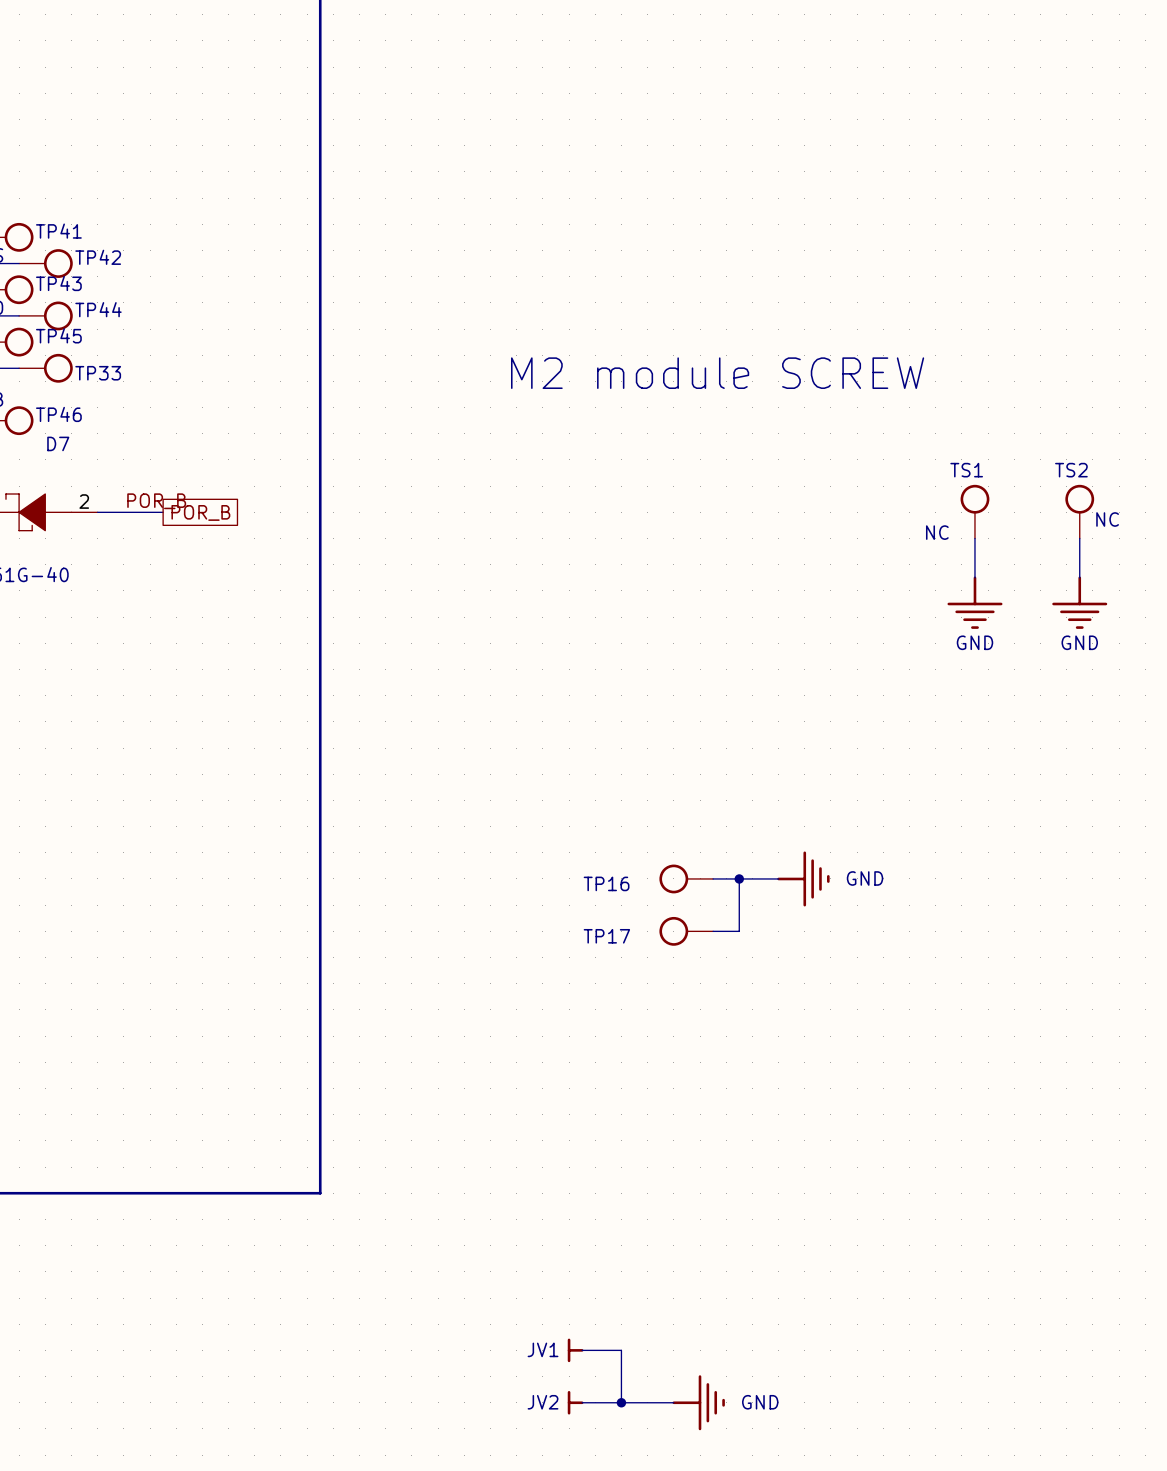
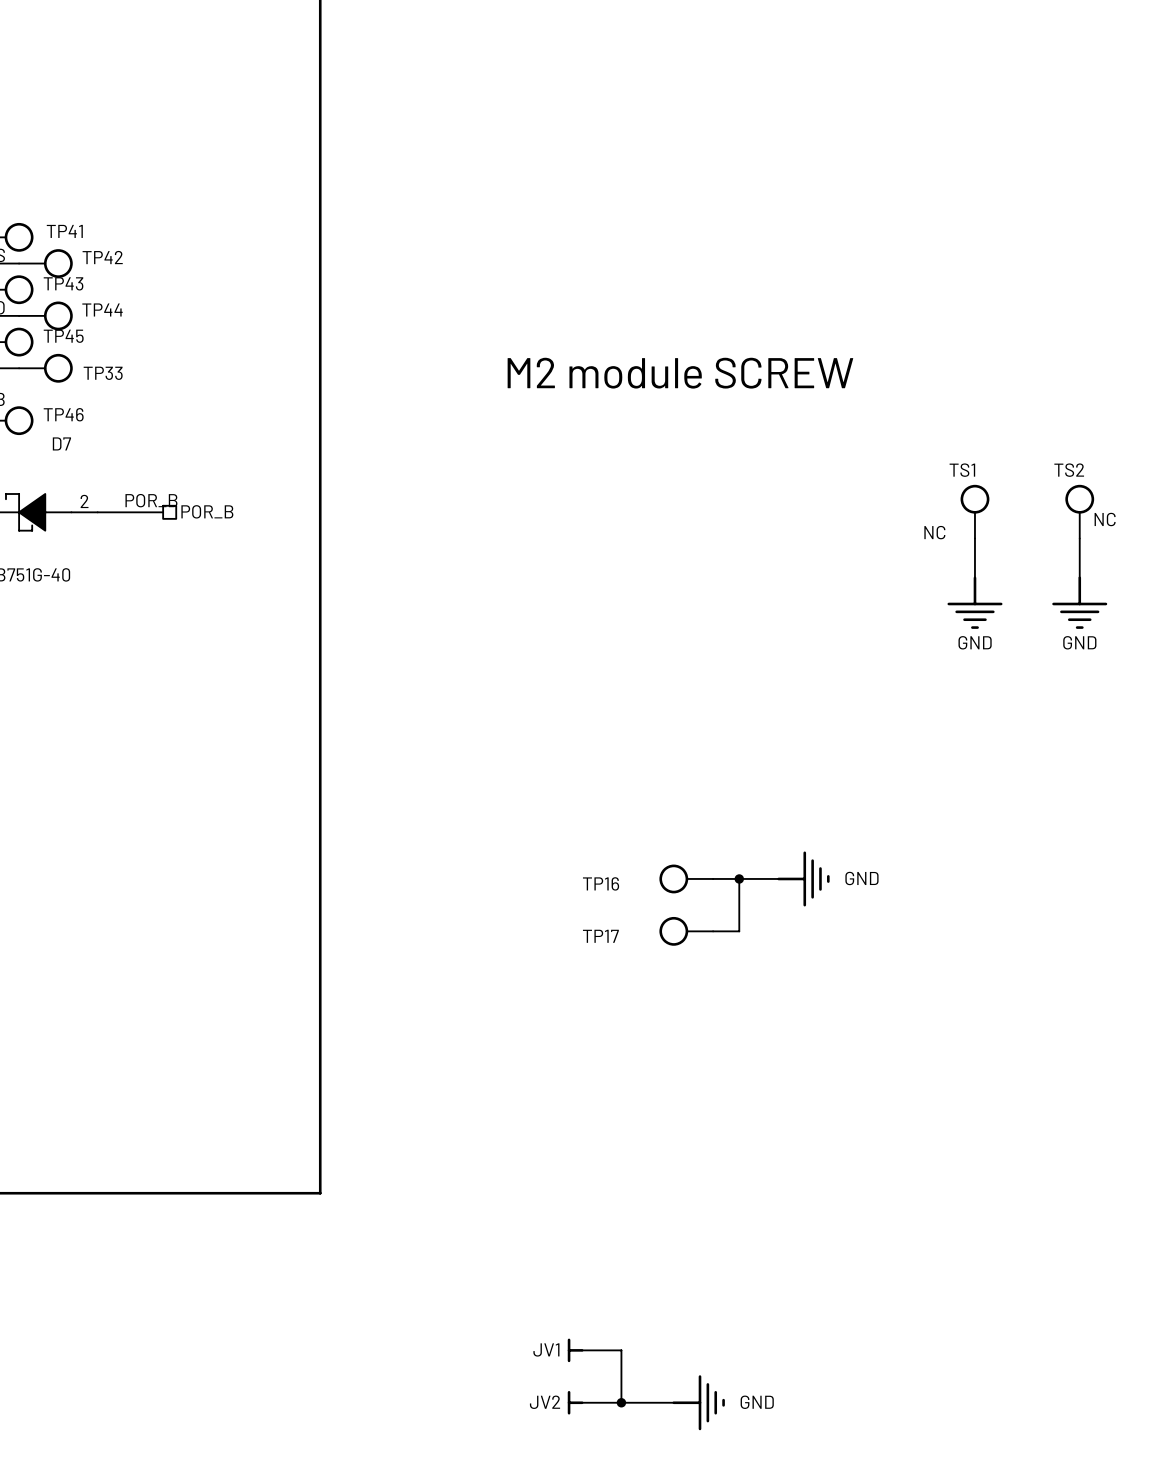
global label: POR_B (200, 512) -> none
hierarchical label: none -> POR_B (207, 511)

